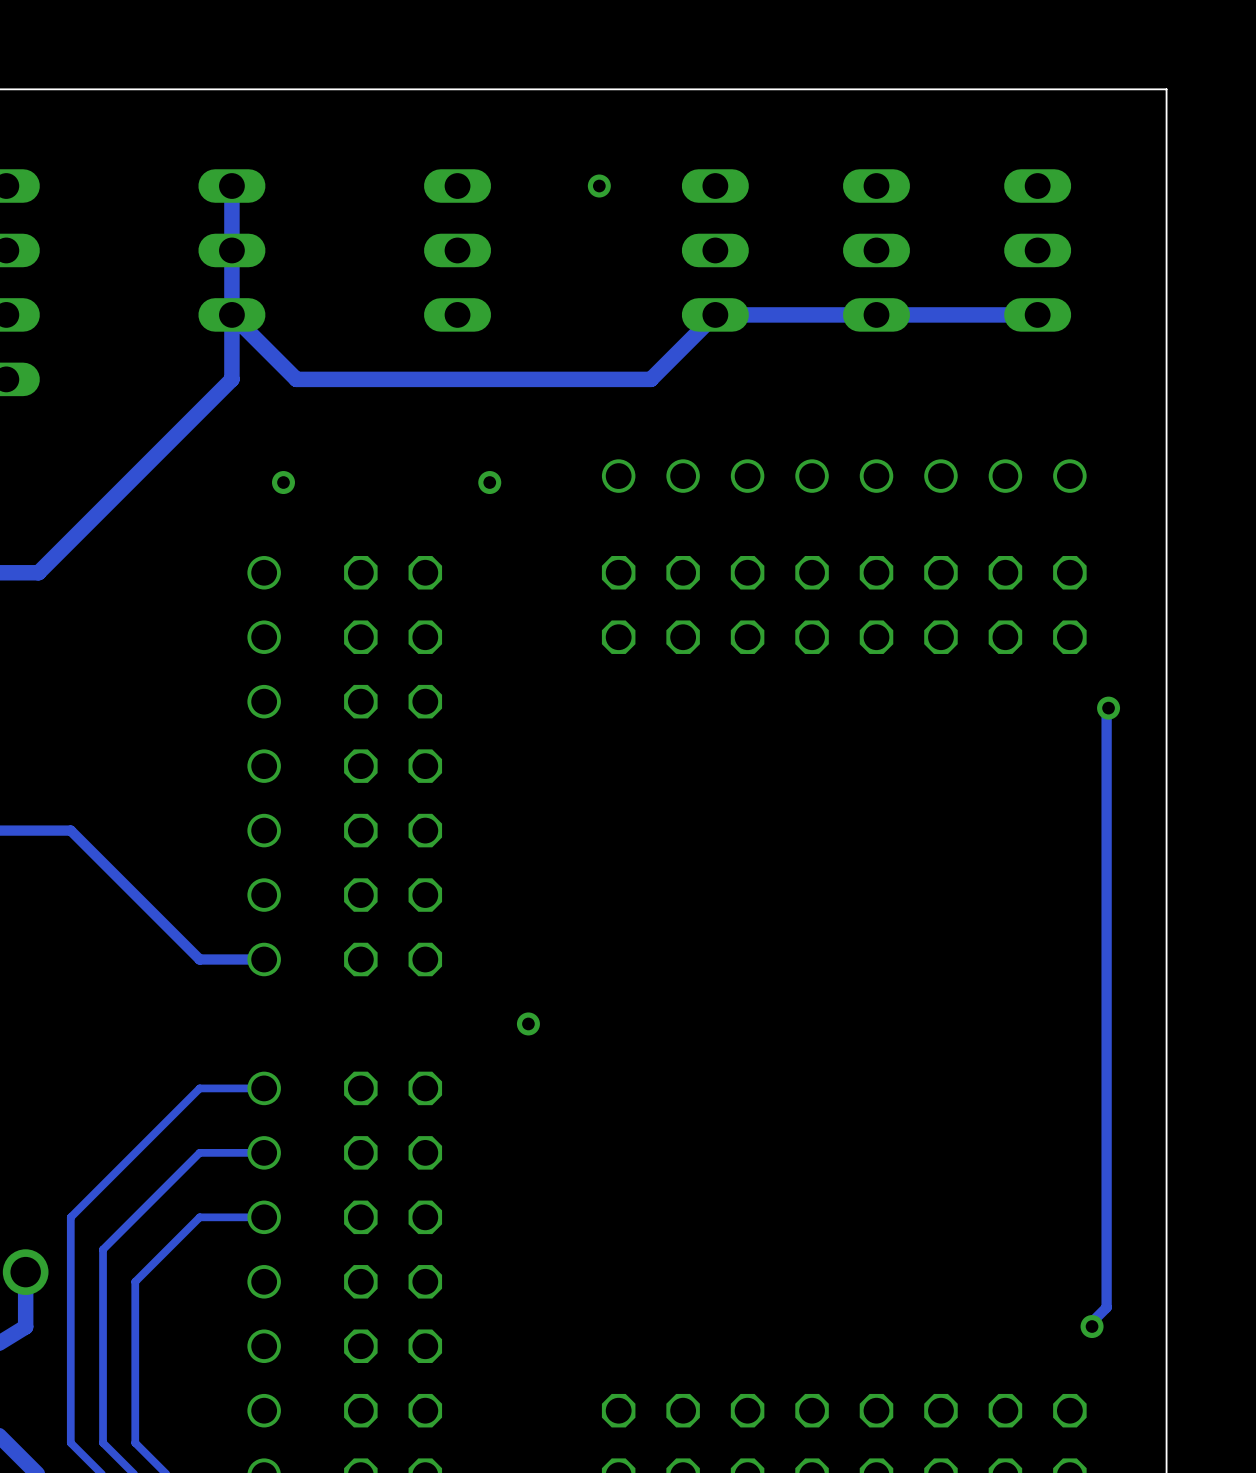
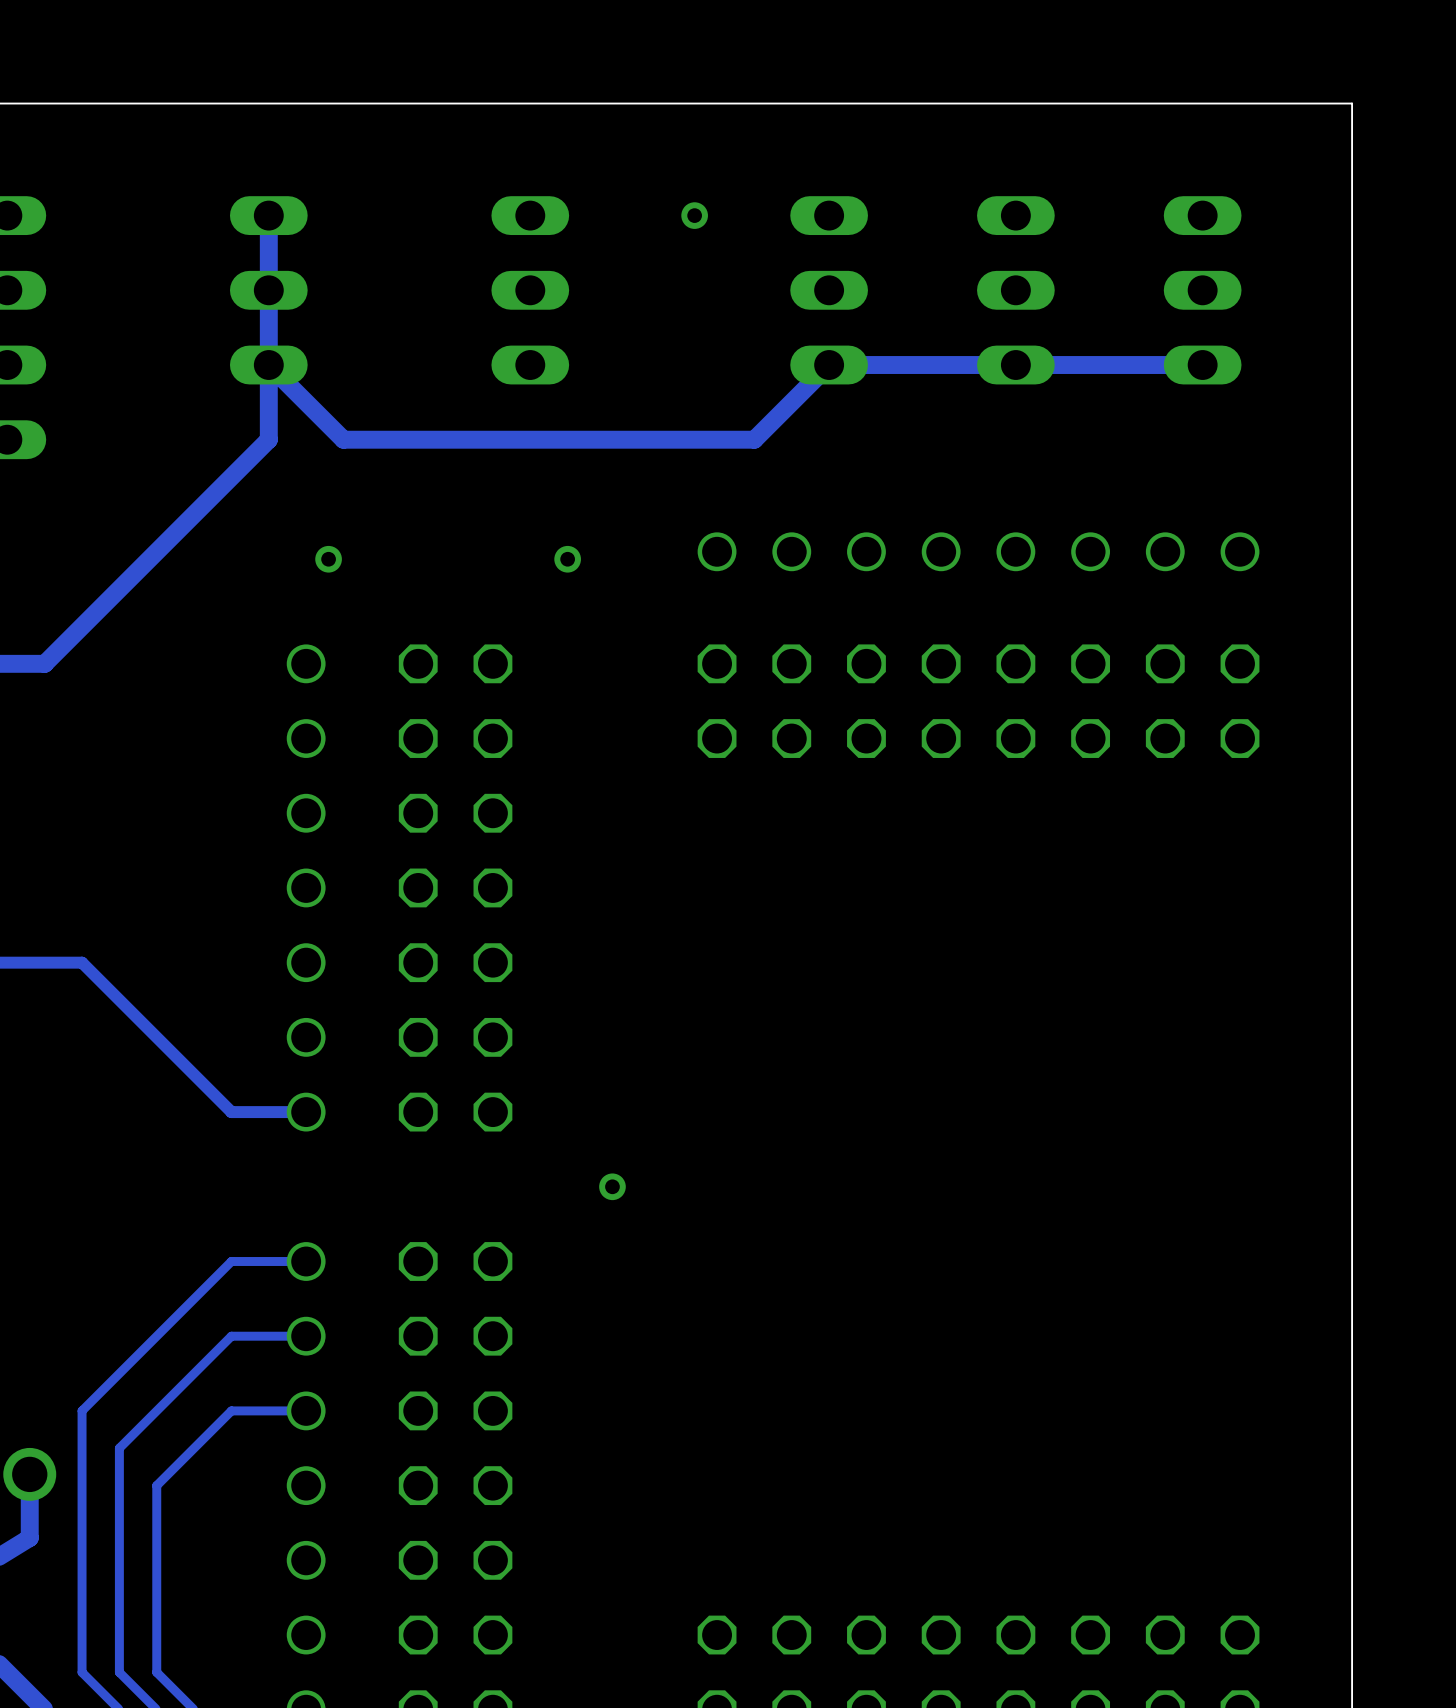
track: (1108, 708) (1106, 710) (1106, 1307) (1092, 1322) (1092, 1326) -> none
via: (1108, 708) -> none
via: (1092, 1326) -> none

